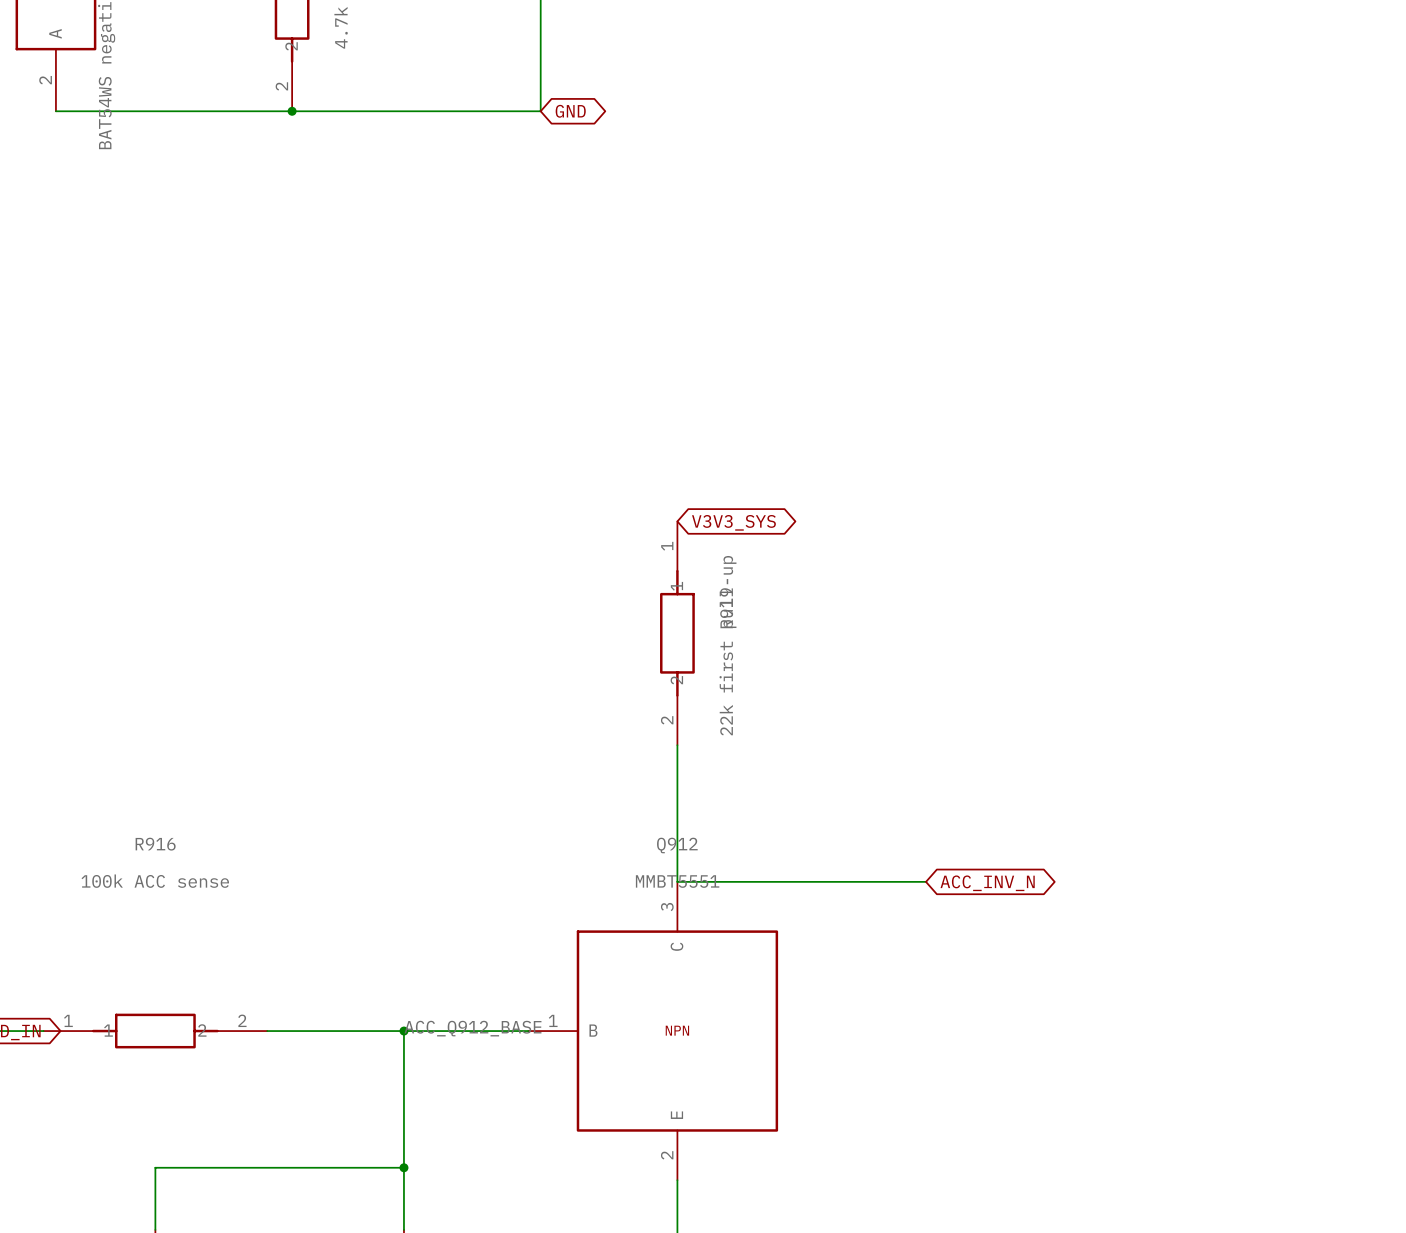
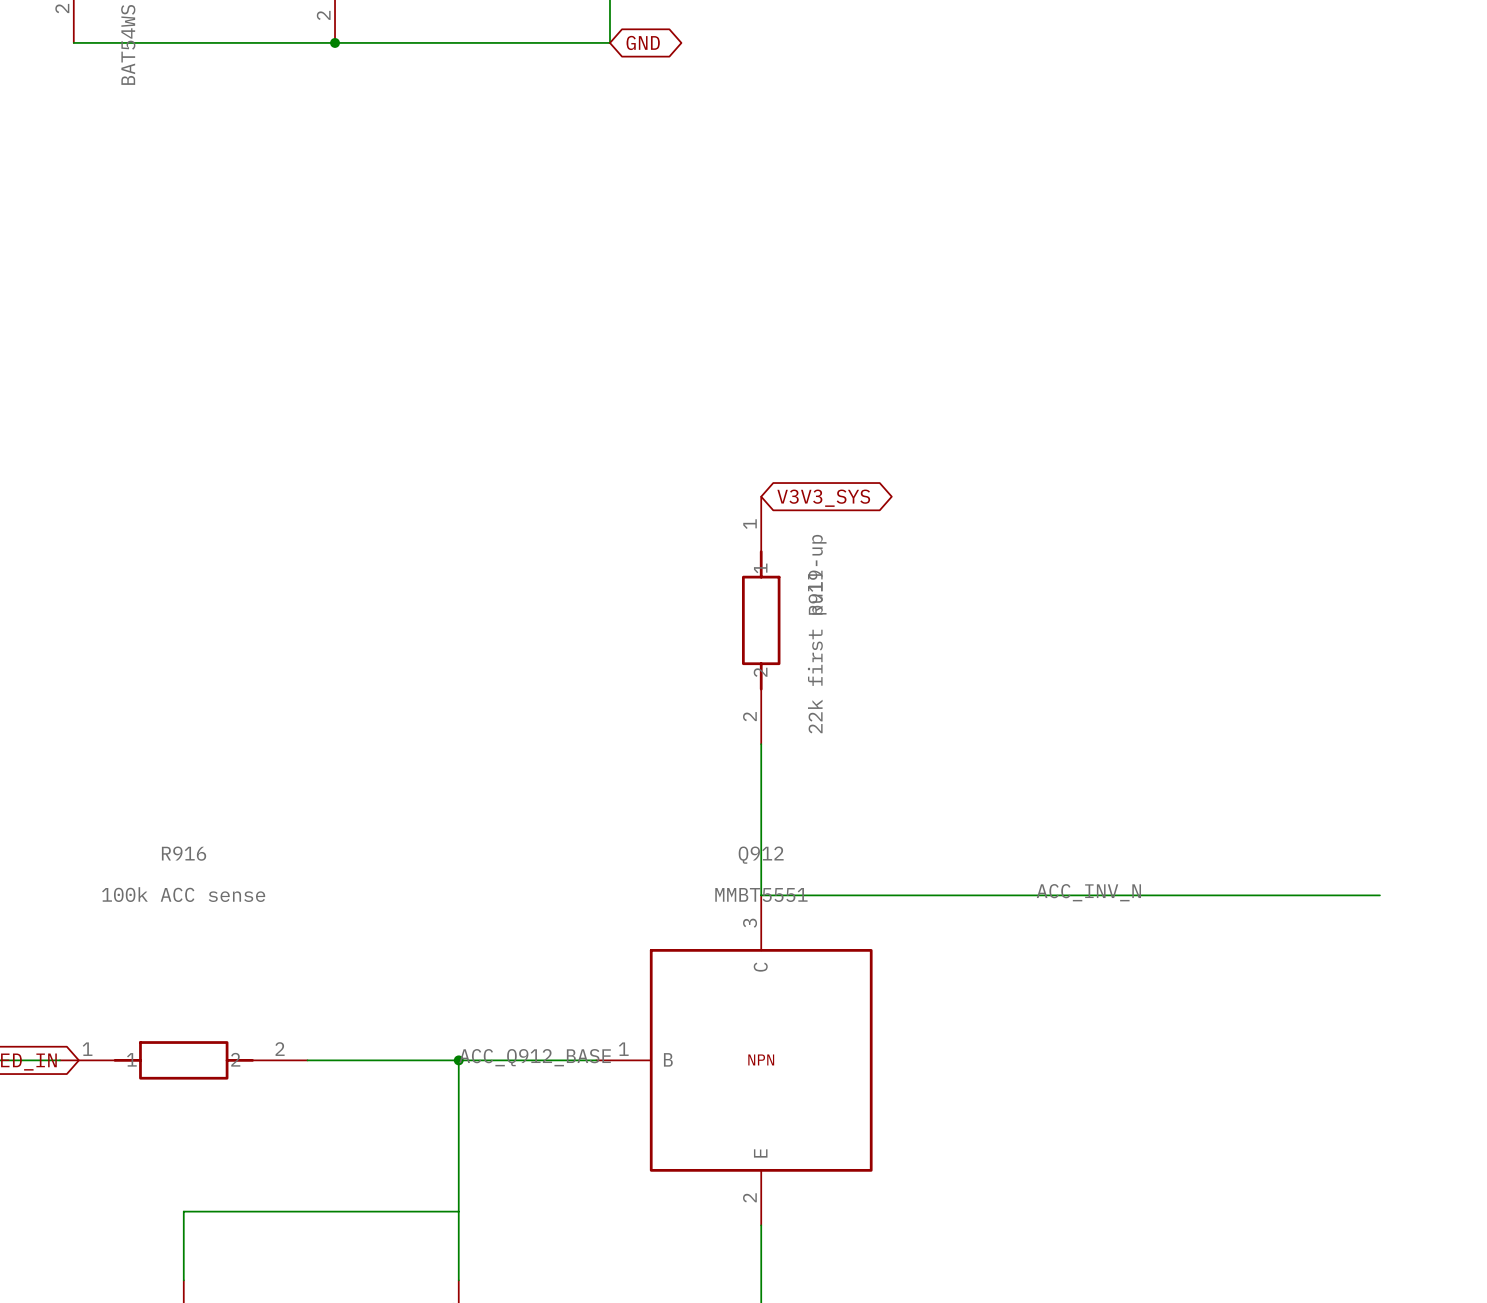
label: none -> ACC_INV_N (1088, 892)
wire: none -> (1036, 895) (1379, 895)
global label: ACC_INV_N (987, 883) -> none
junction: (403, 1167) -> none

